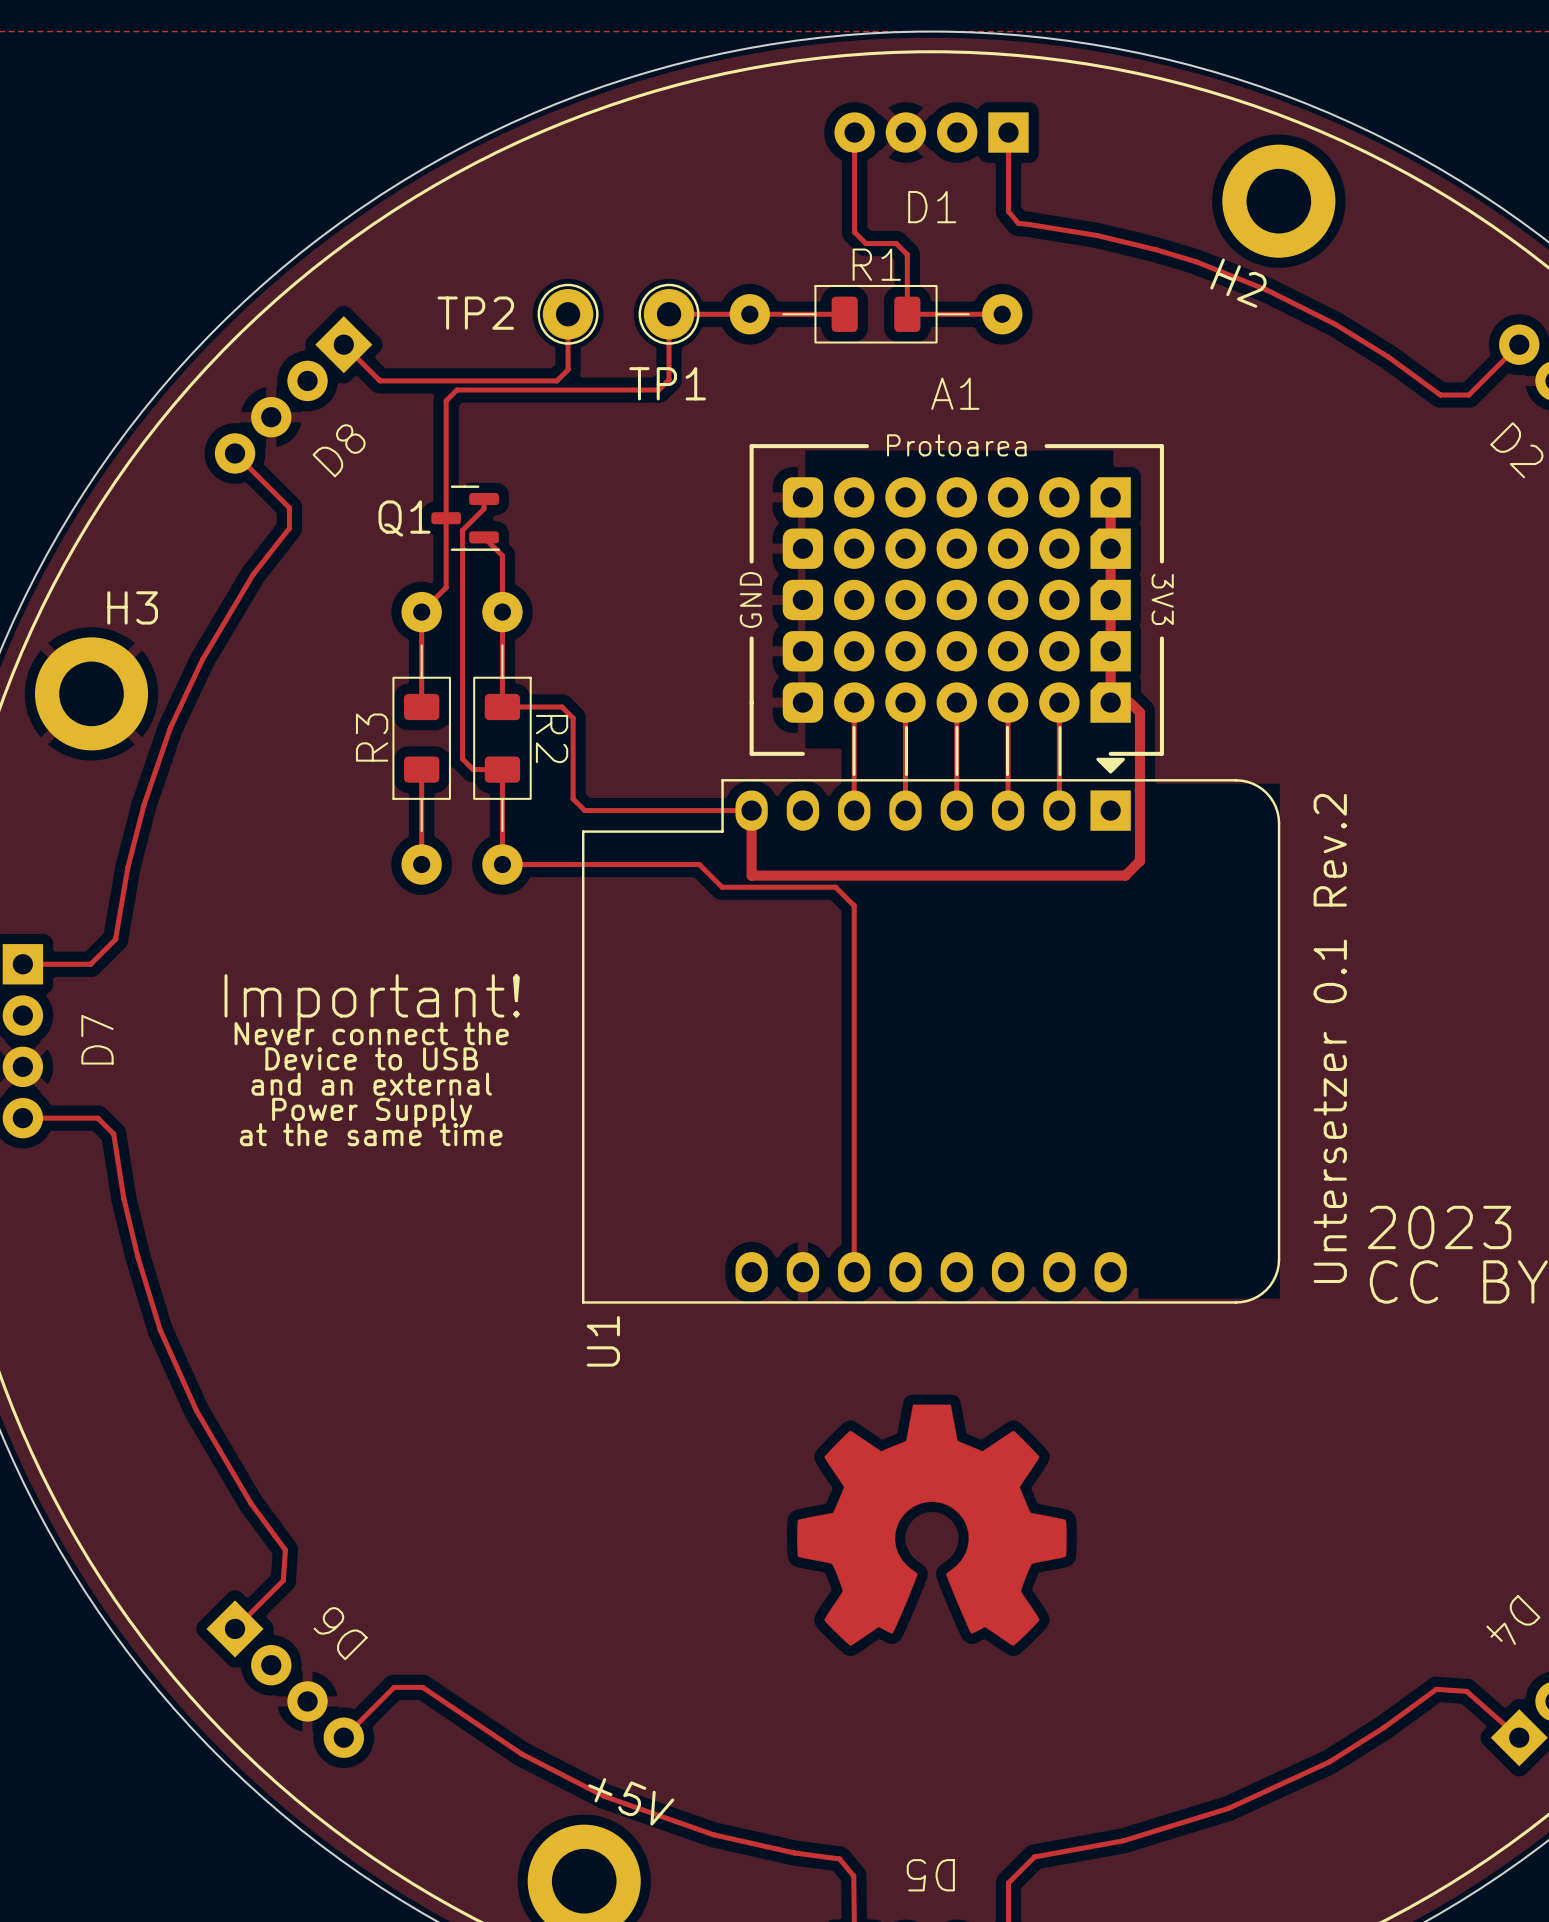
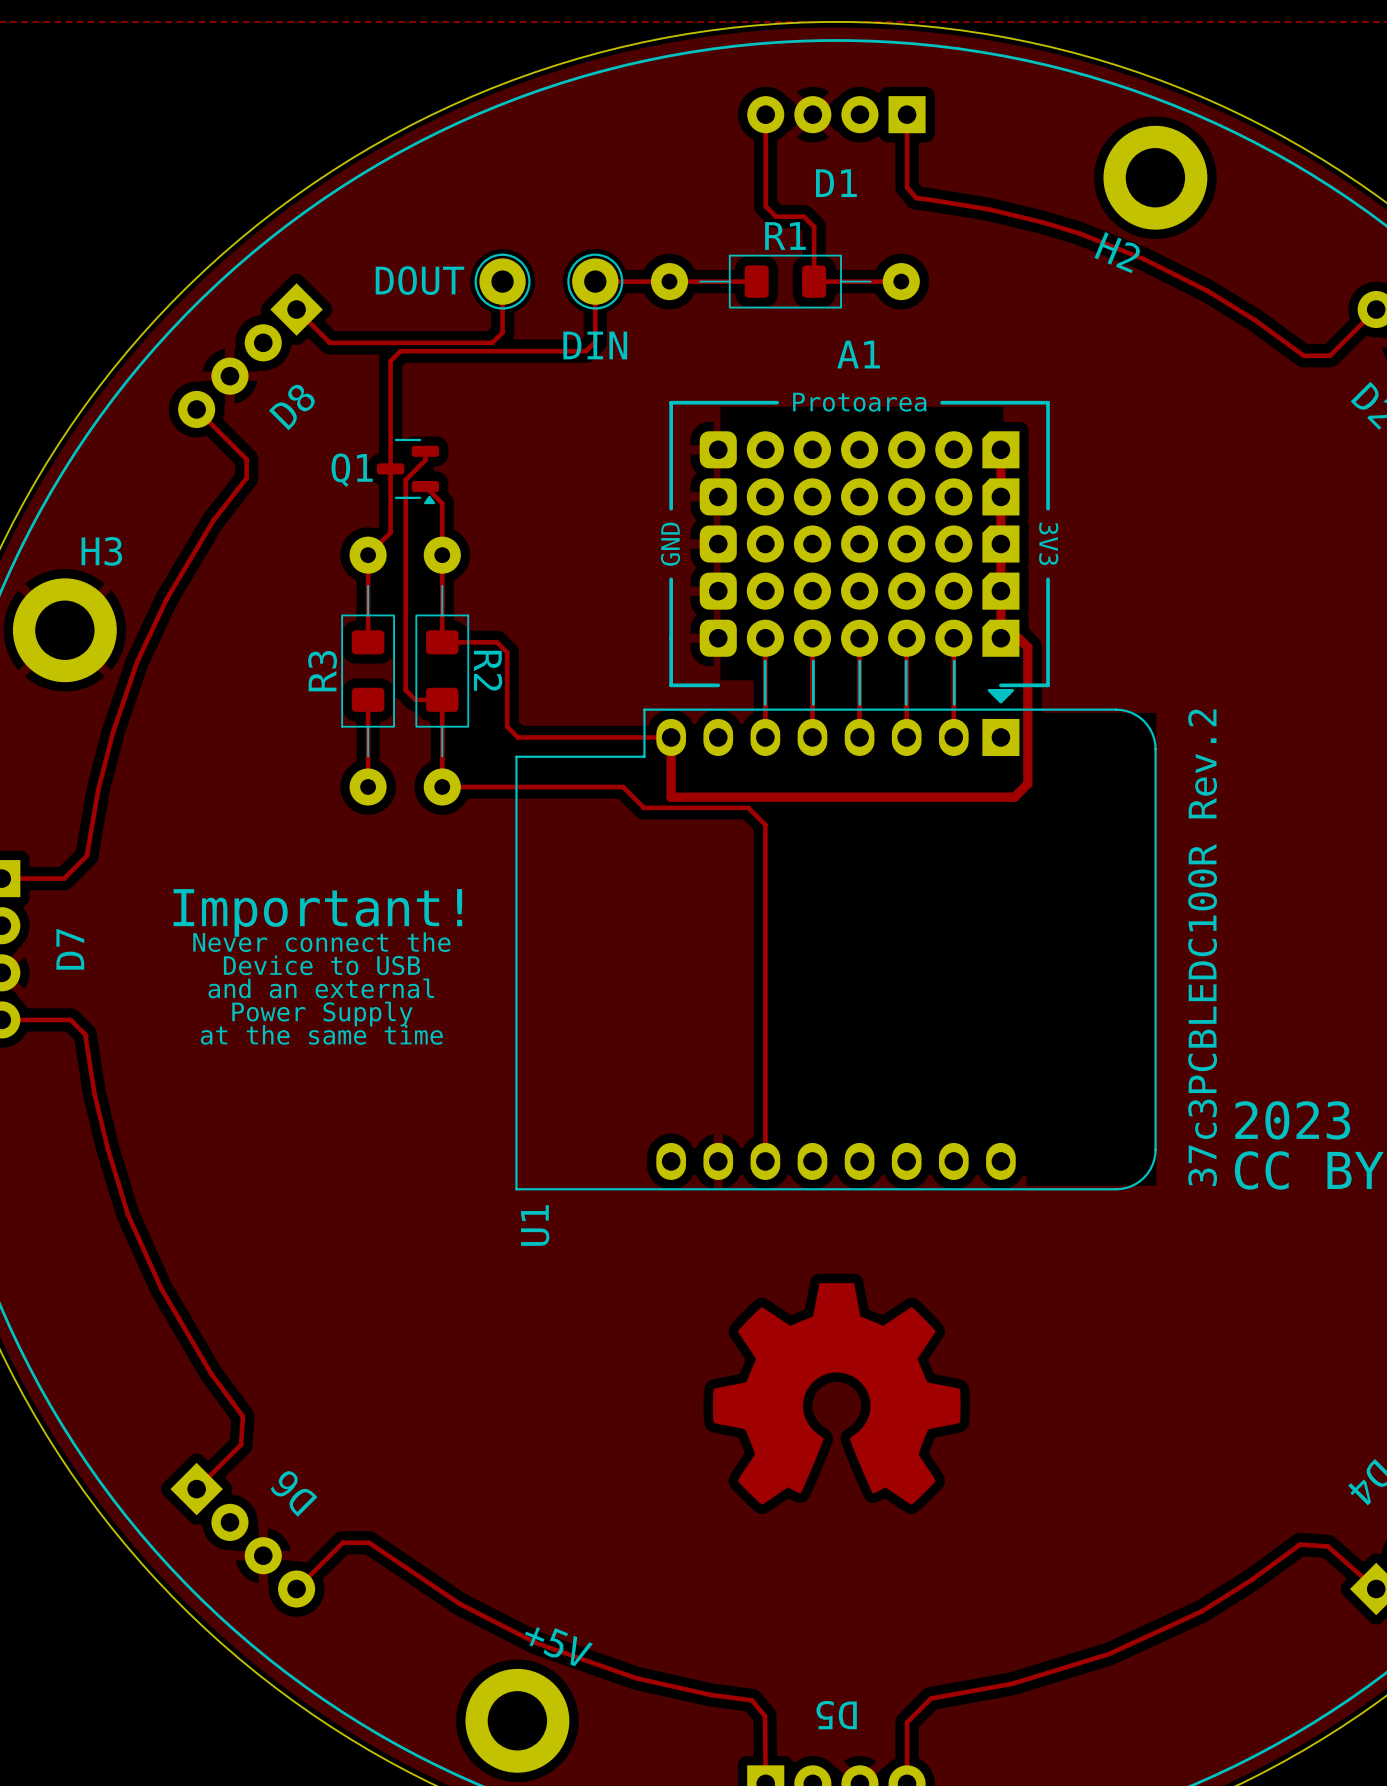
TP2 name: TP2 (475, 313) -> DOUT (419, 280)
TP1 name: TP1 (667, 383) -> DIN (595, 345)
Q1 footprint: [431, 485, 501, 551] -> [376, 438, 440, 505]
text: Untersetzer 0.1 Rev.2 (1330, 1038) -> 37c3PCBLEDC100R Rev.2 (1202, 947)

